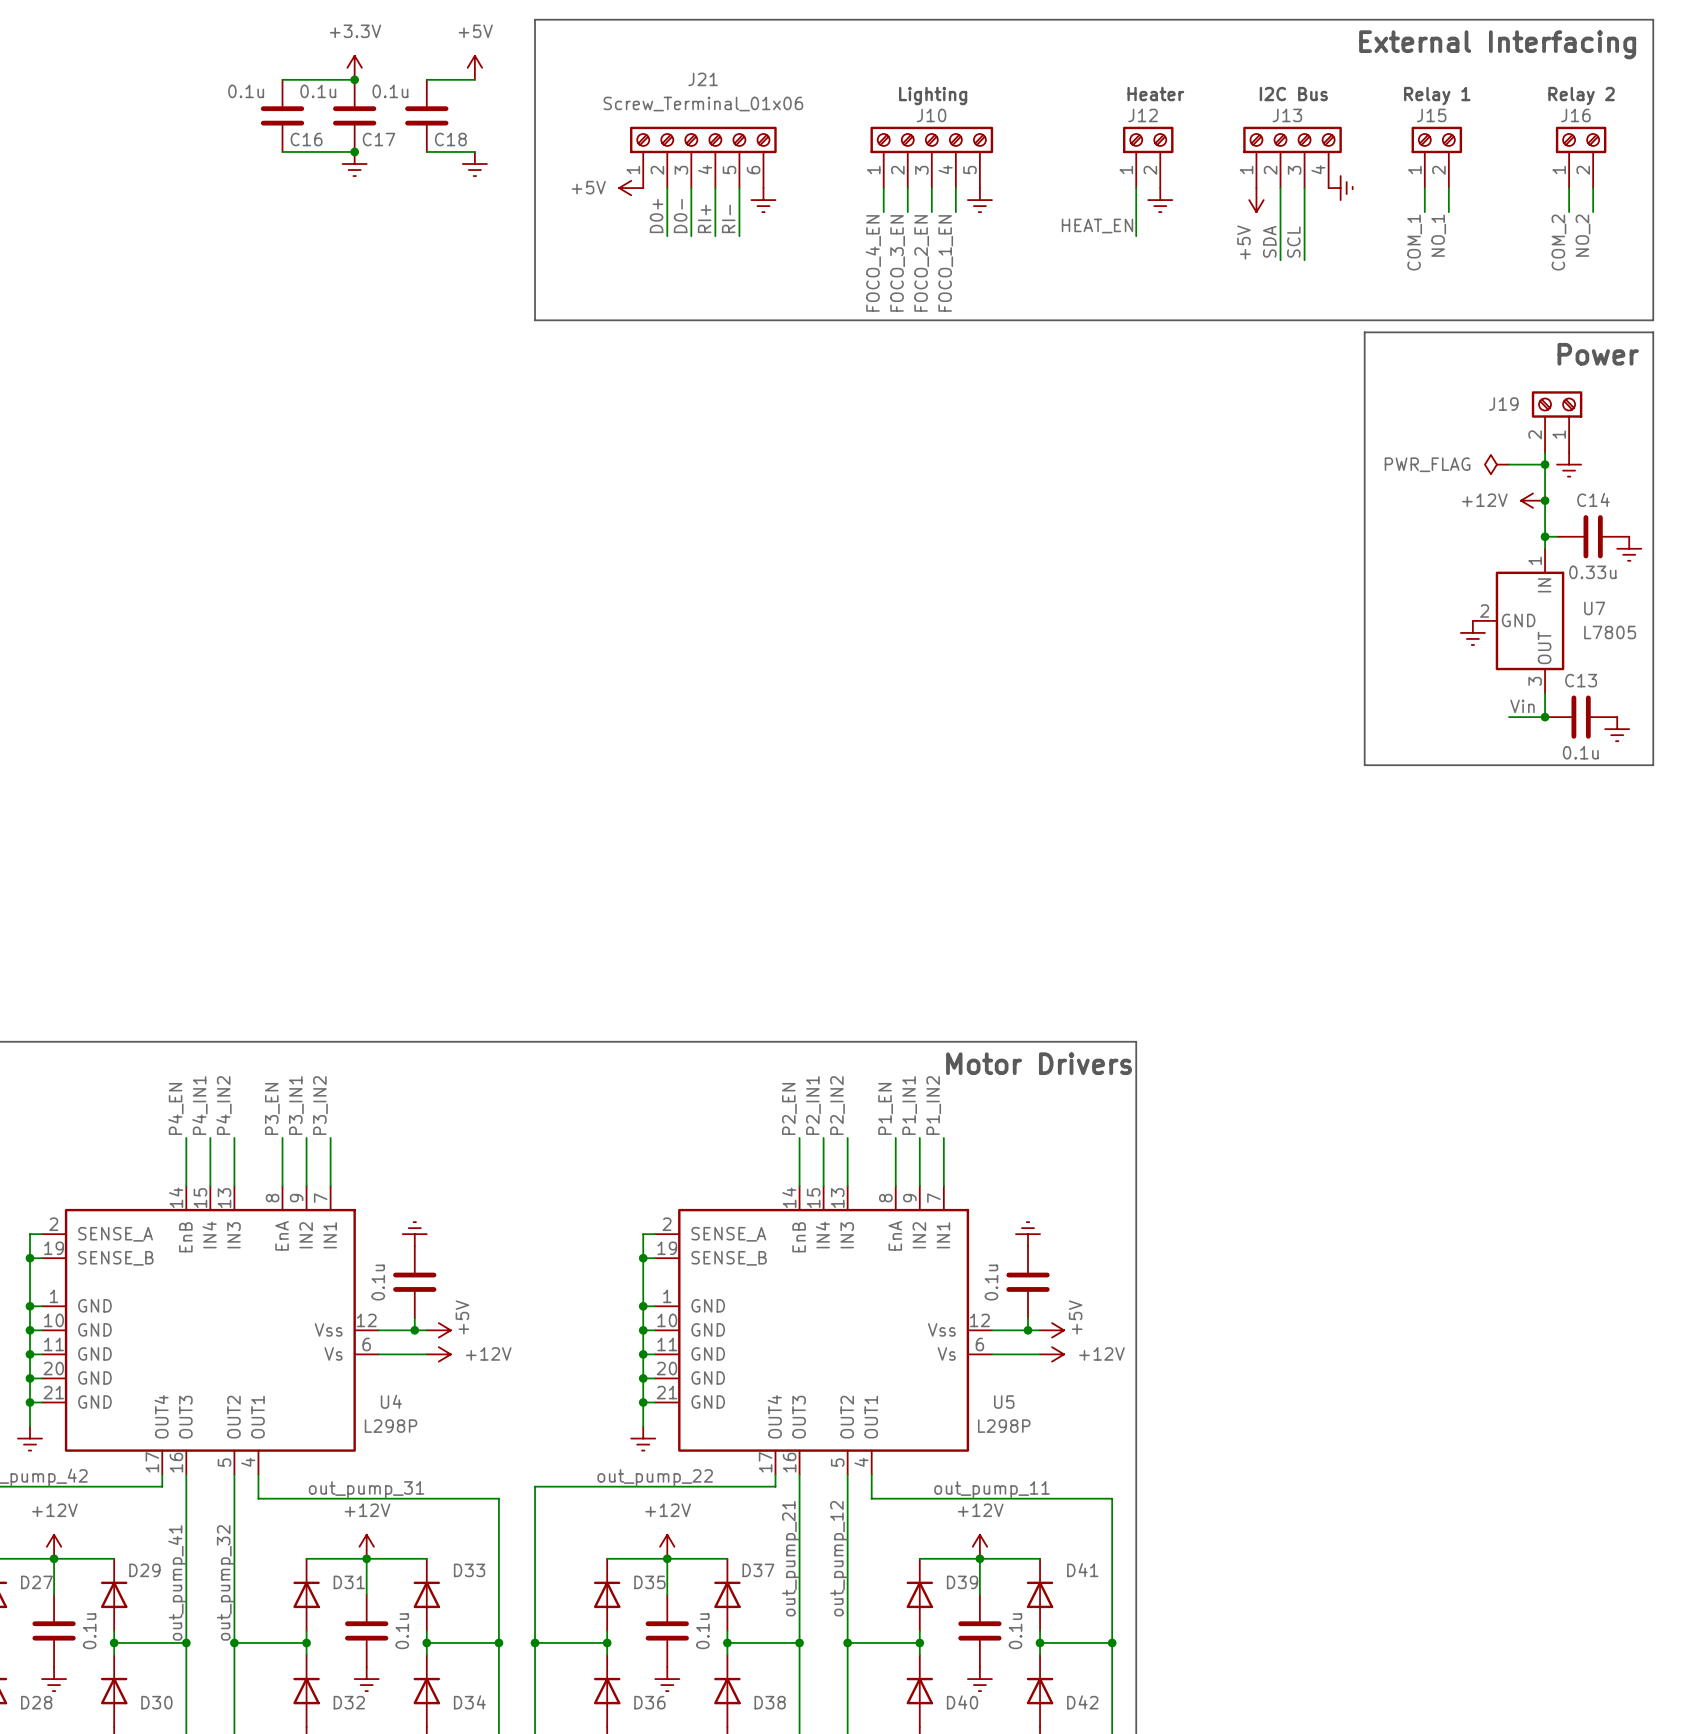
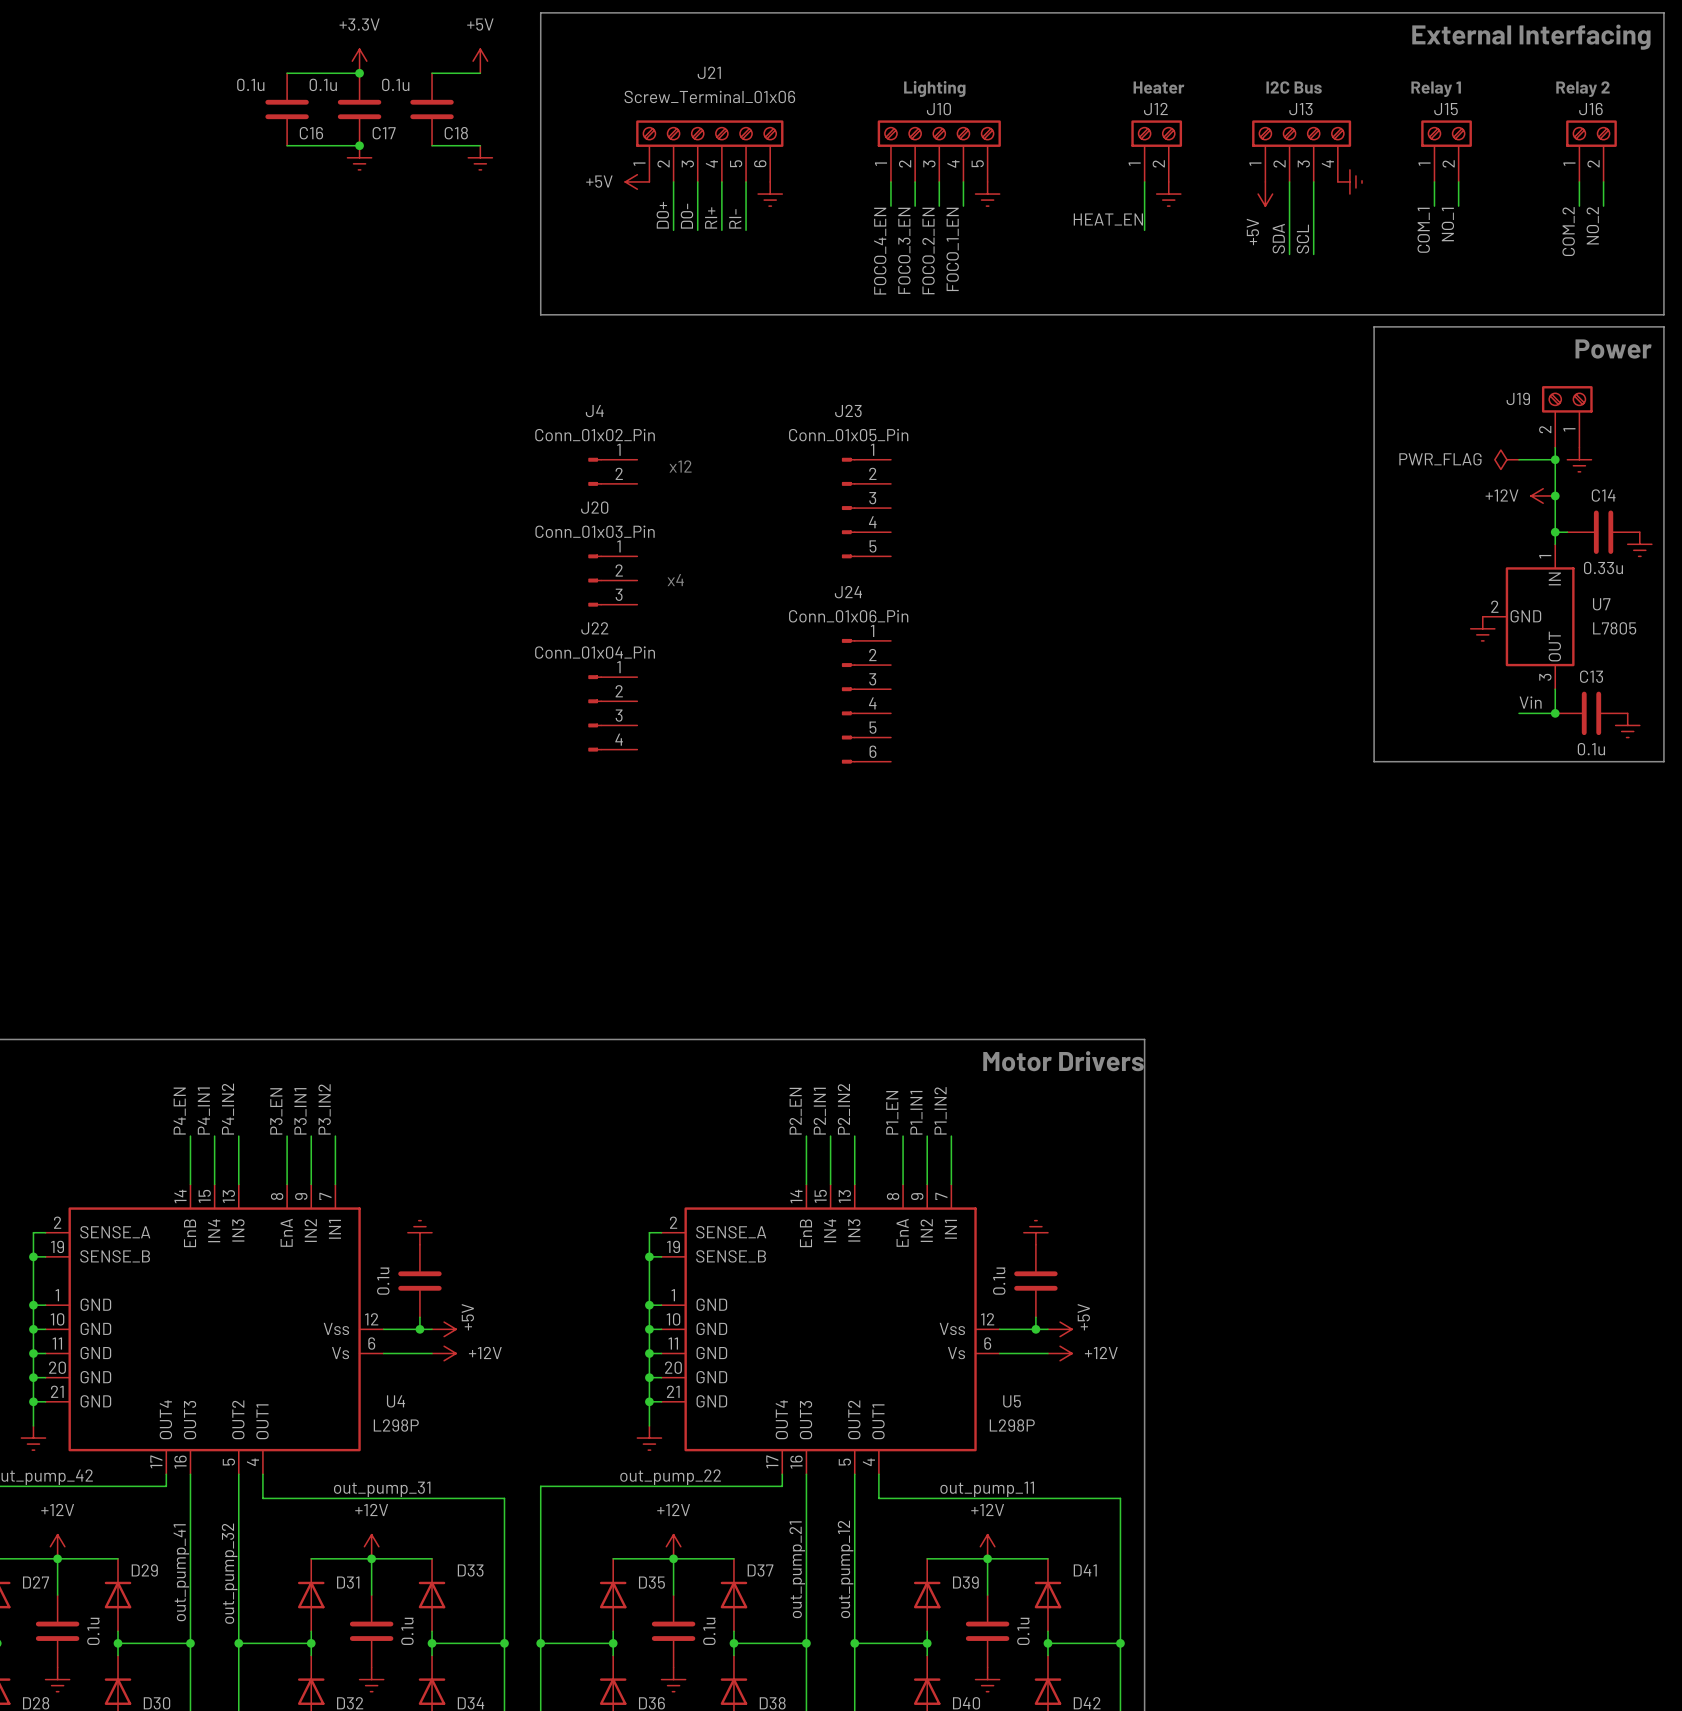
text: none -> x12 (680, 466)
J4: none -> Conn_01x02_Pin (612, 471)
J23: none -> Conn_01x05_Pin (866, 508)
J20: none -> Conn_01x03_Pin (612, 580)
text: none -> x4 (675, 580)
J24: none -> Conn_01x06_Pin (866, 701)
J22: none -> Conn_01x04_Pin (612, 713)

